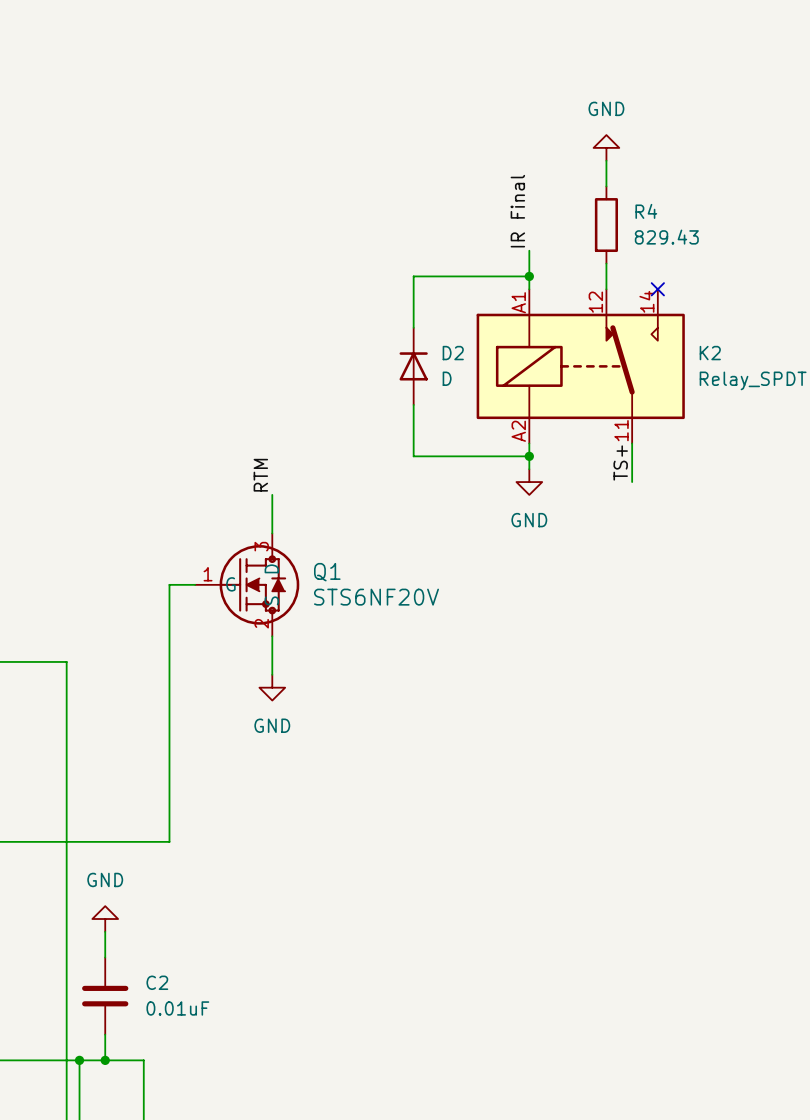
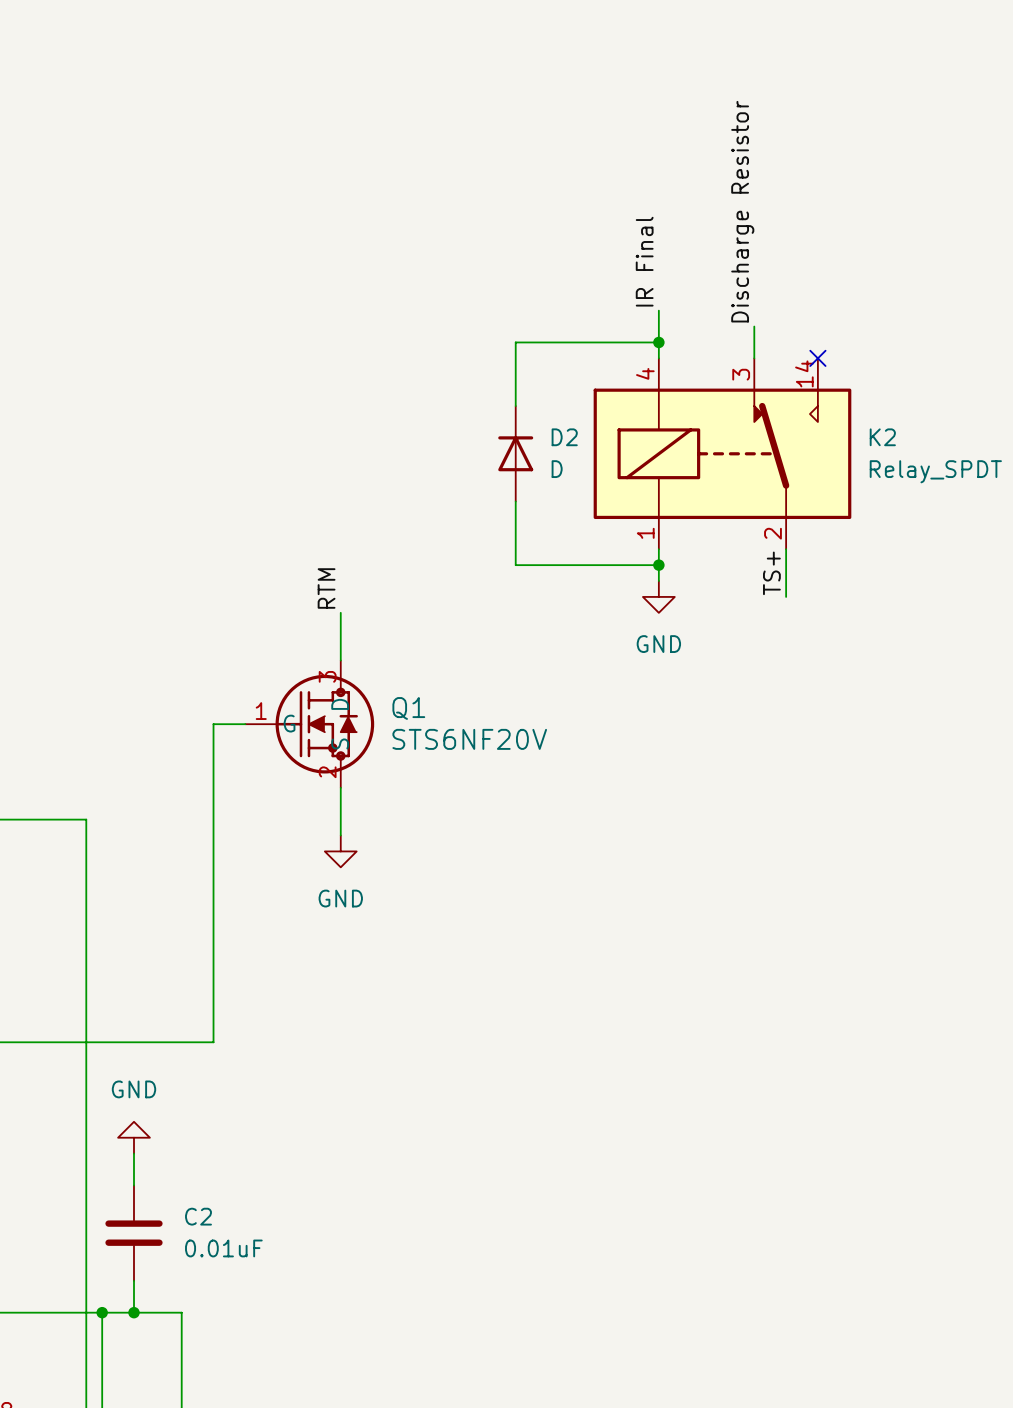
power symbol: GND (606, 147) -> none
wire: (606, 160) (606, 186) -> none
label: none -> Discharge Resistor (742, 211)
R4: 829.43 (606, 225) -> none
K2 pin number: A1 (518, 302) -> 4 (645, 373)
K2 pin number: 12 (595, 302) -> 3 (741, 374)
K2 pin number: 11 (621, 430) -> 2 (772, 533)
K2 pin number: A2 (518, 431) -> 1 (645, 533)

